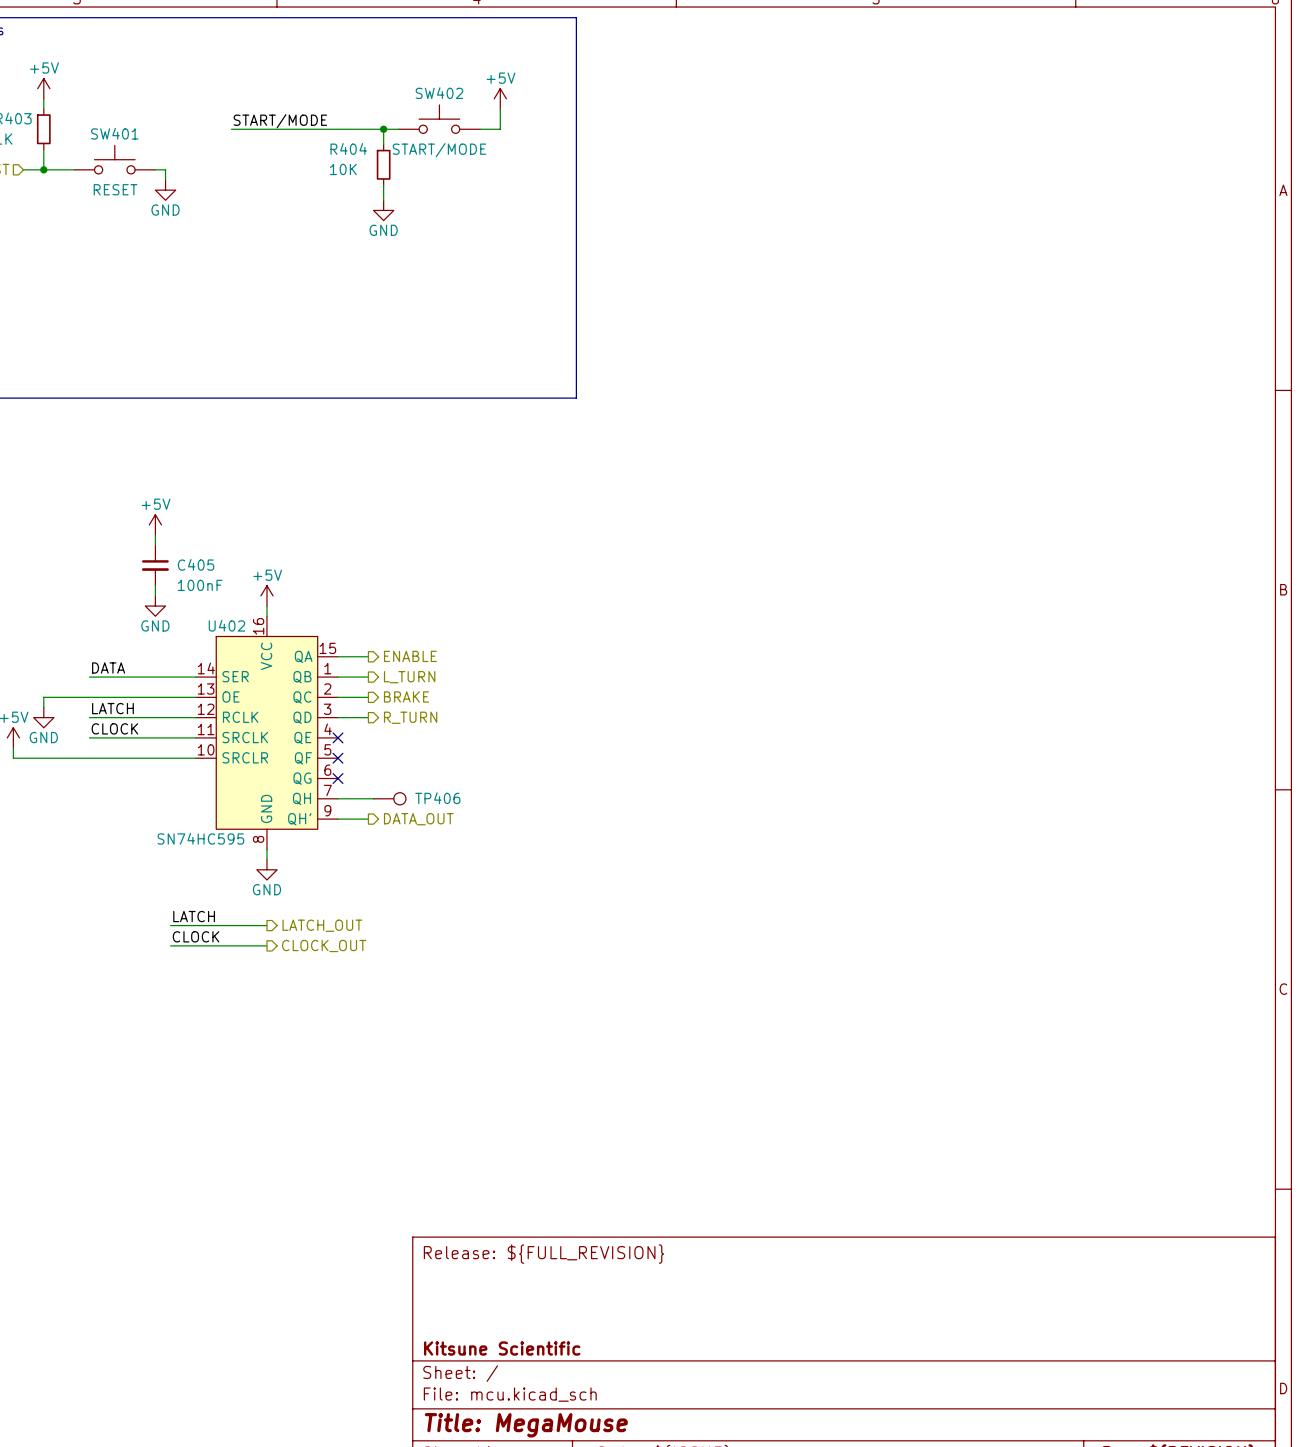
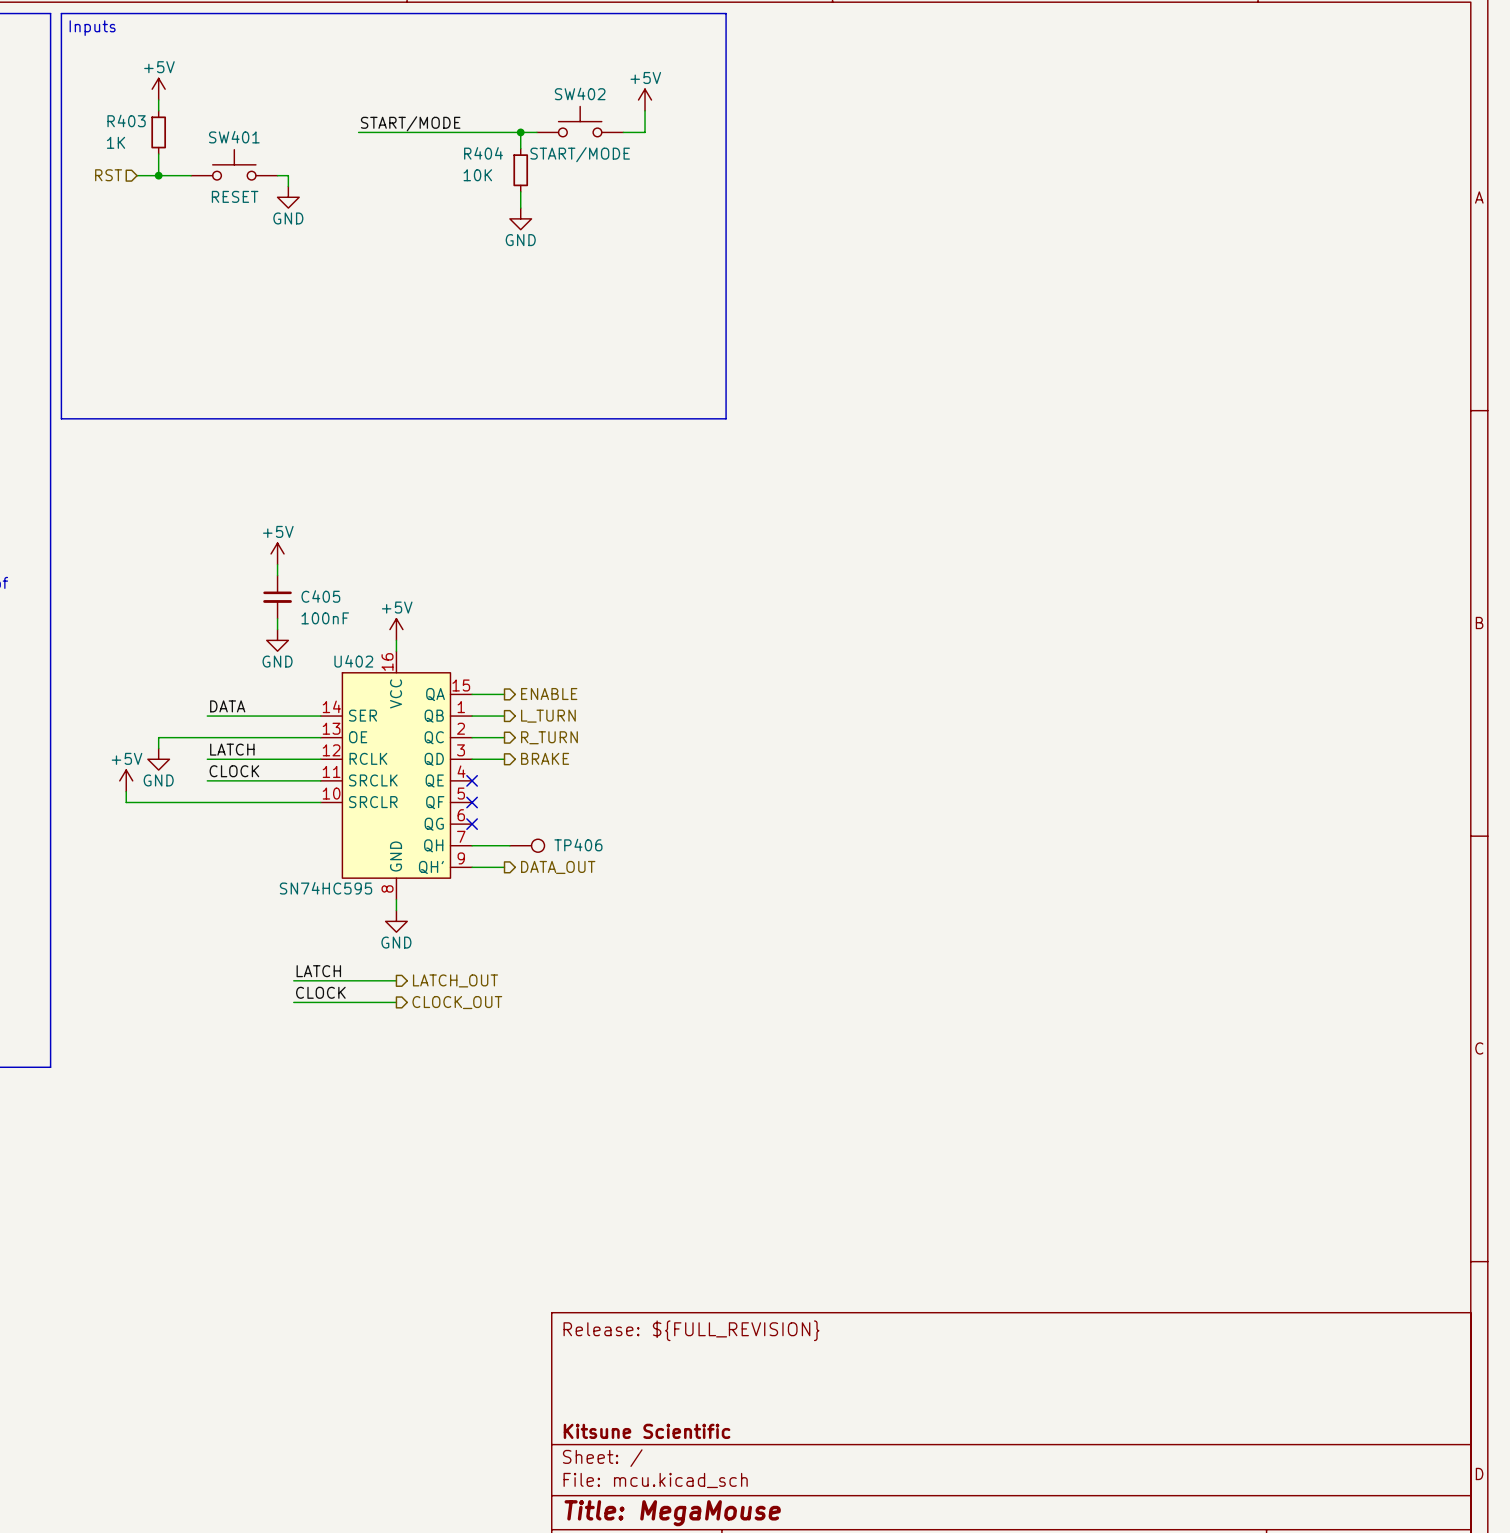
hierarchical label: BRAKE (406, 696) -> R_TURN (549, 737)
hierarchical label: R_TURN (410, 717) -> BRAKE (545, 758)

